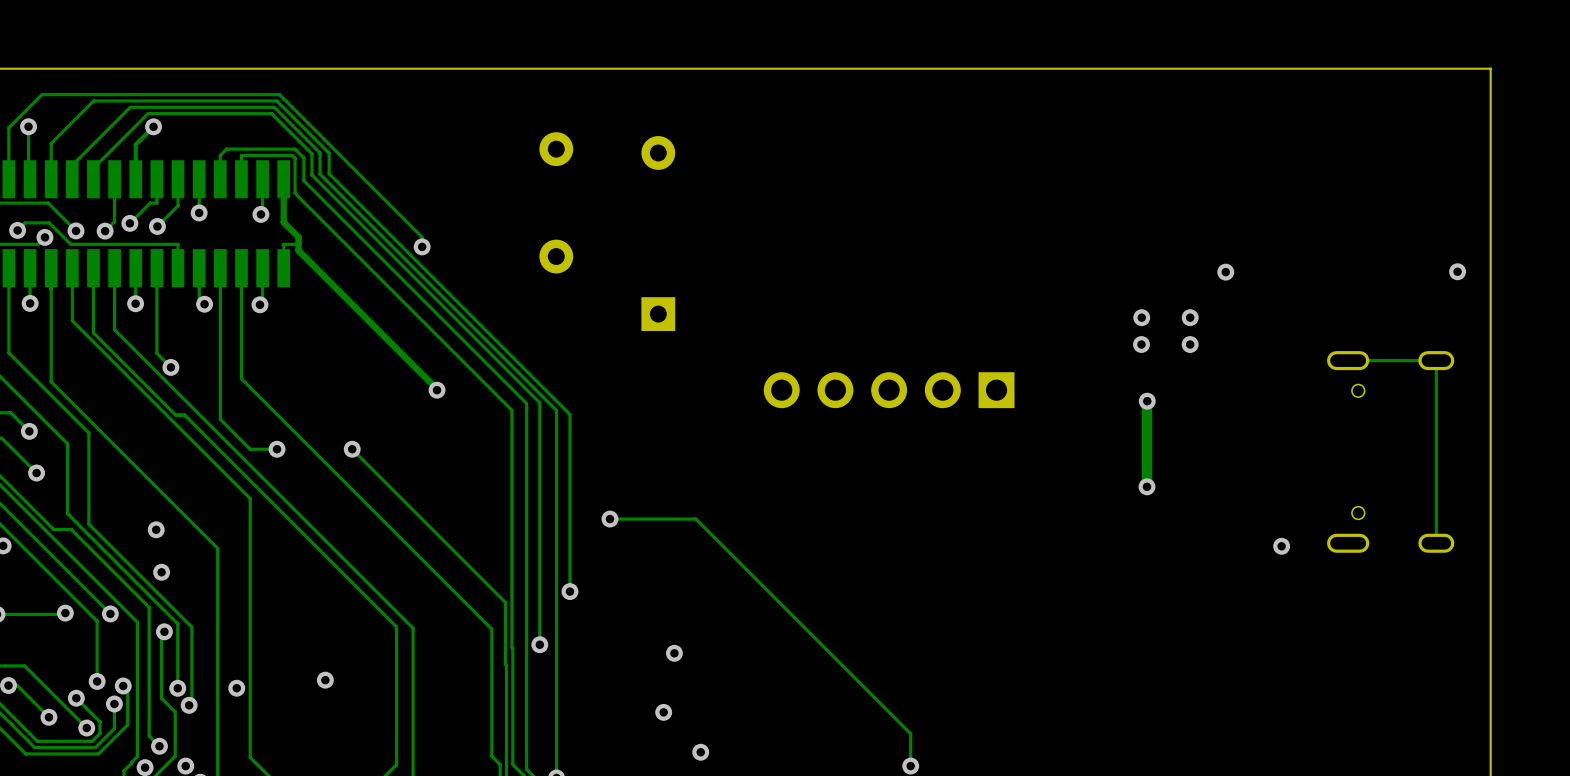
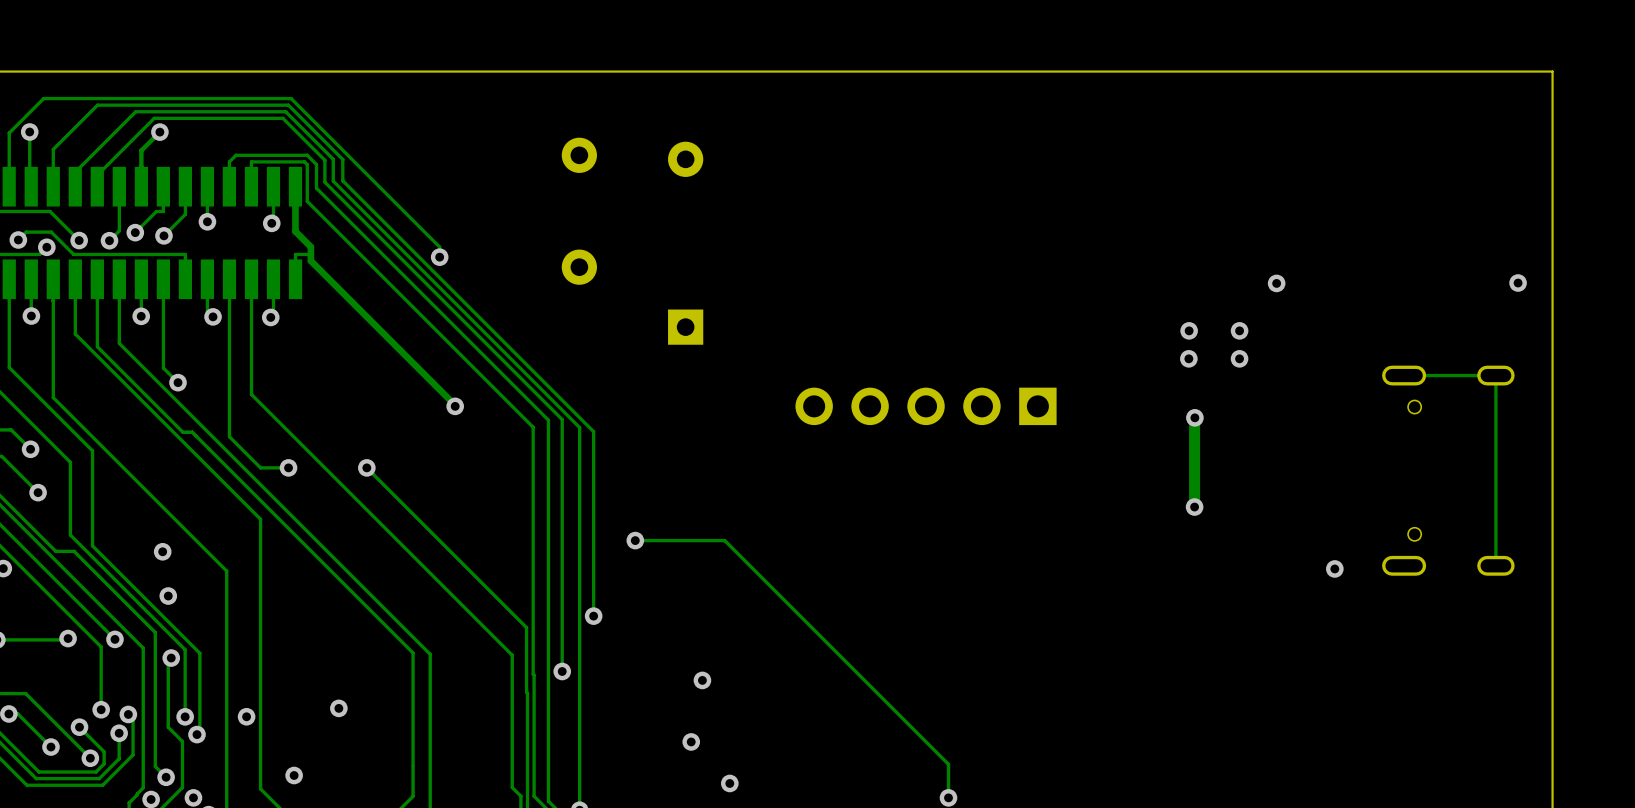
via: none -> (294, 775)

